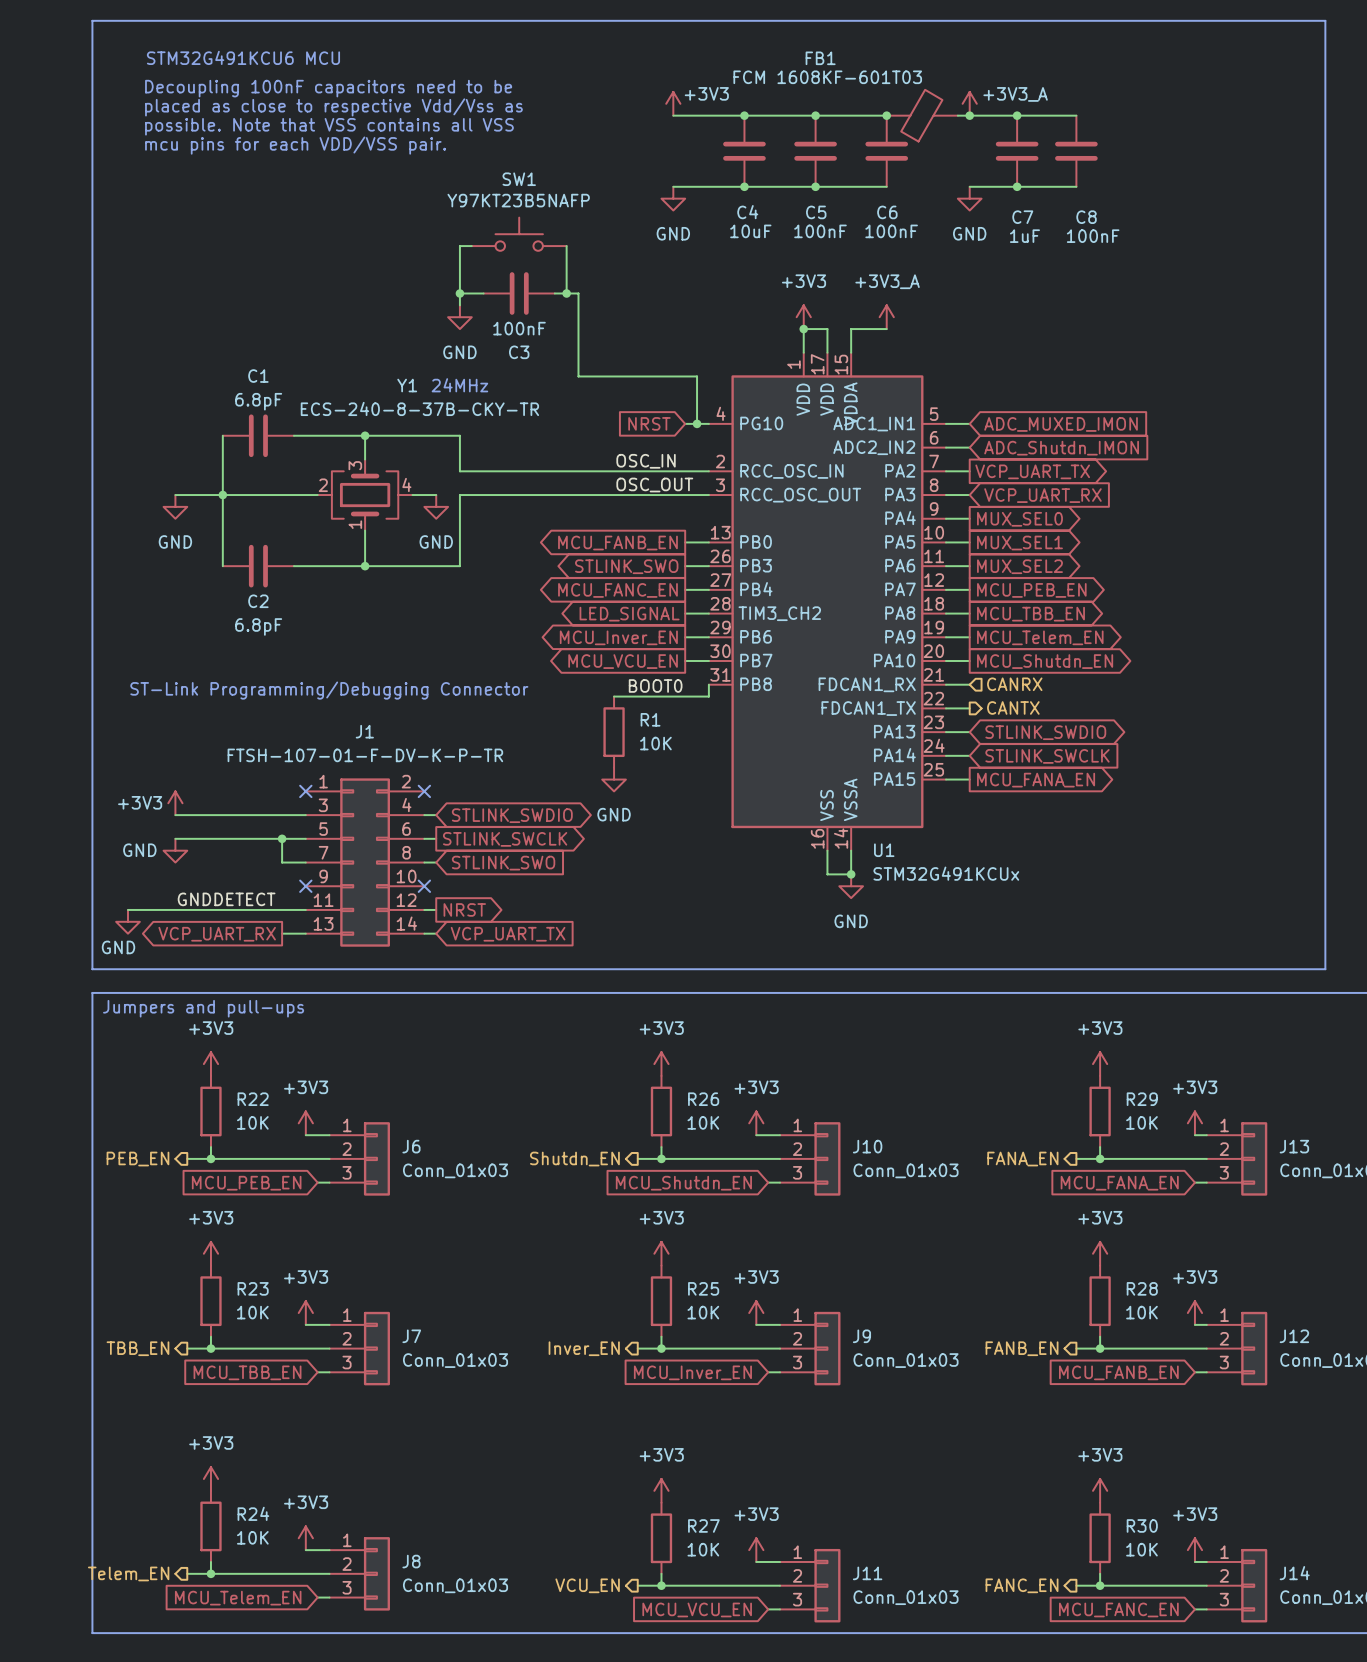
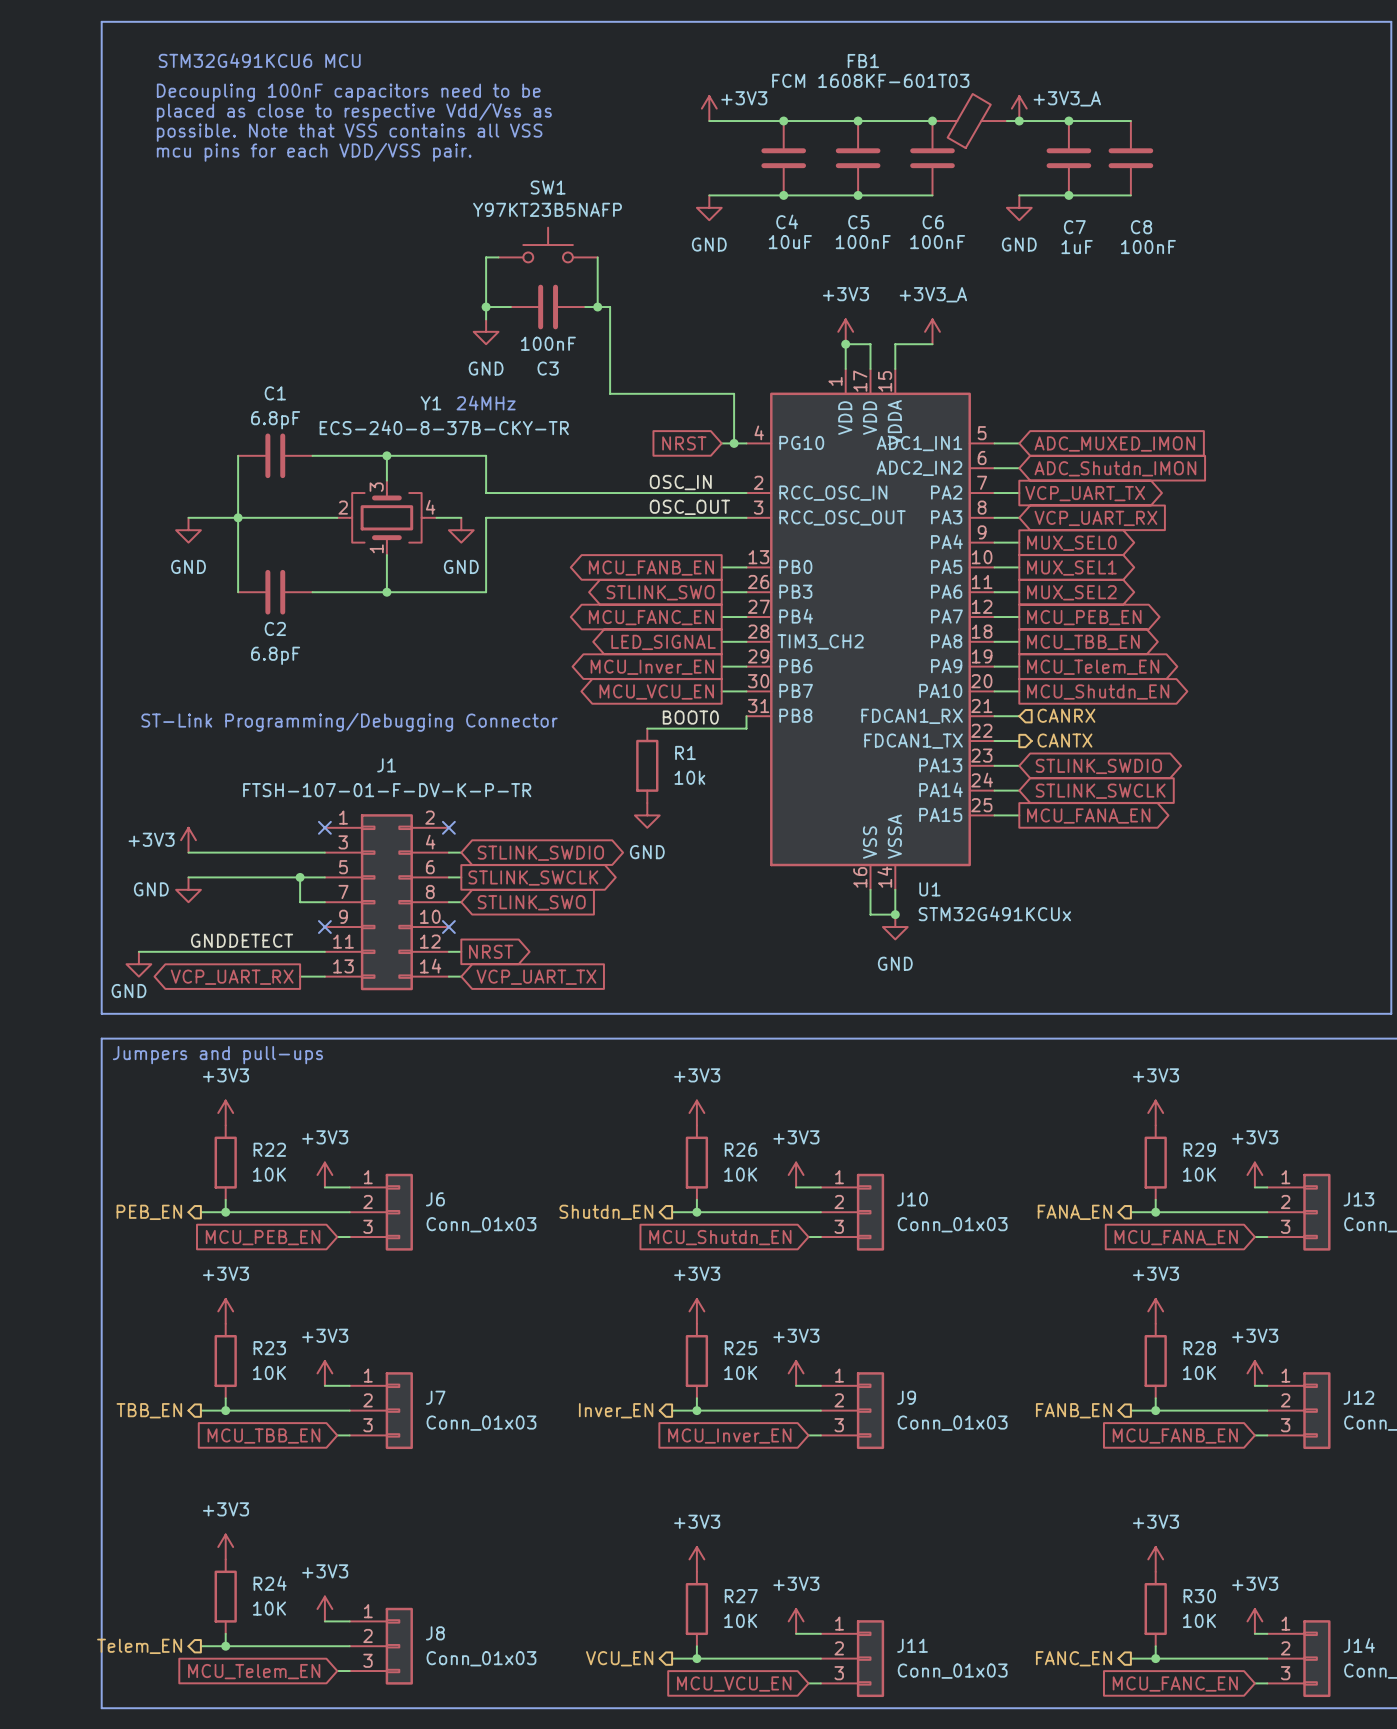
R1 value: 10K (655, 743) -> 10k (689, 777)

